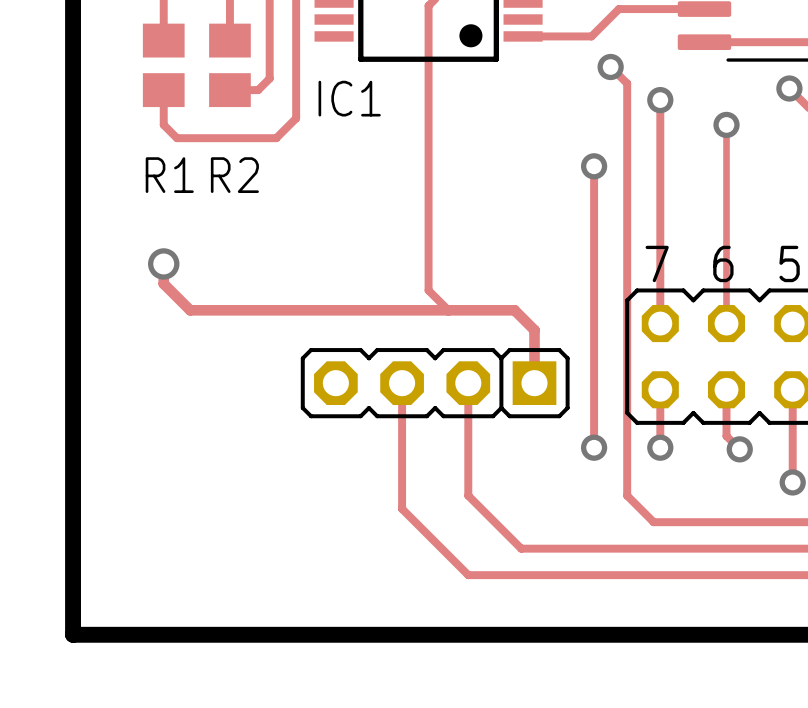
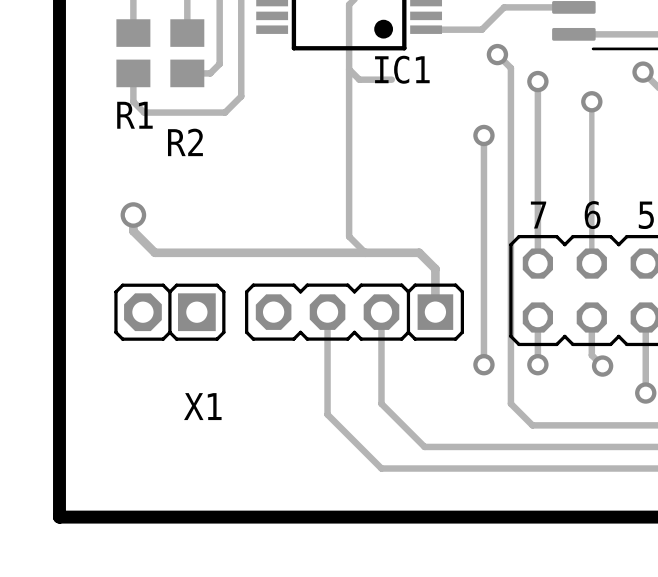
track: none -> (349, 69) (359, 79) (391, 79)
IC1 name position: IC1 (349, 98) -> IC1 (402, 69)
R1 name position: R1 (169, 175) -> R1 (134, 115)
X1: none -> (169, 312)

